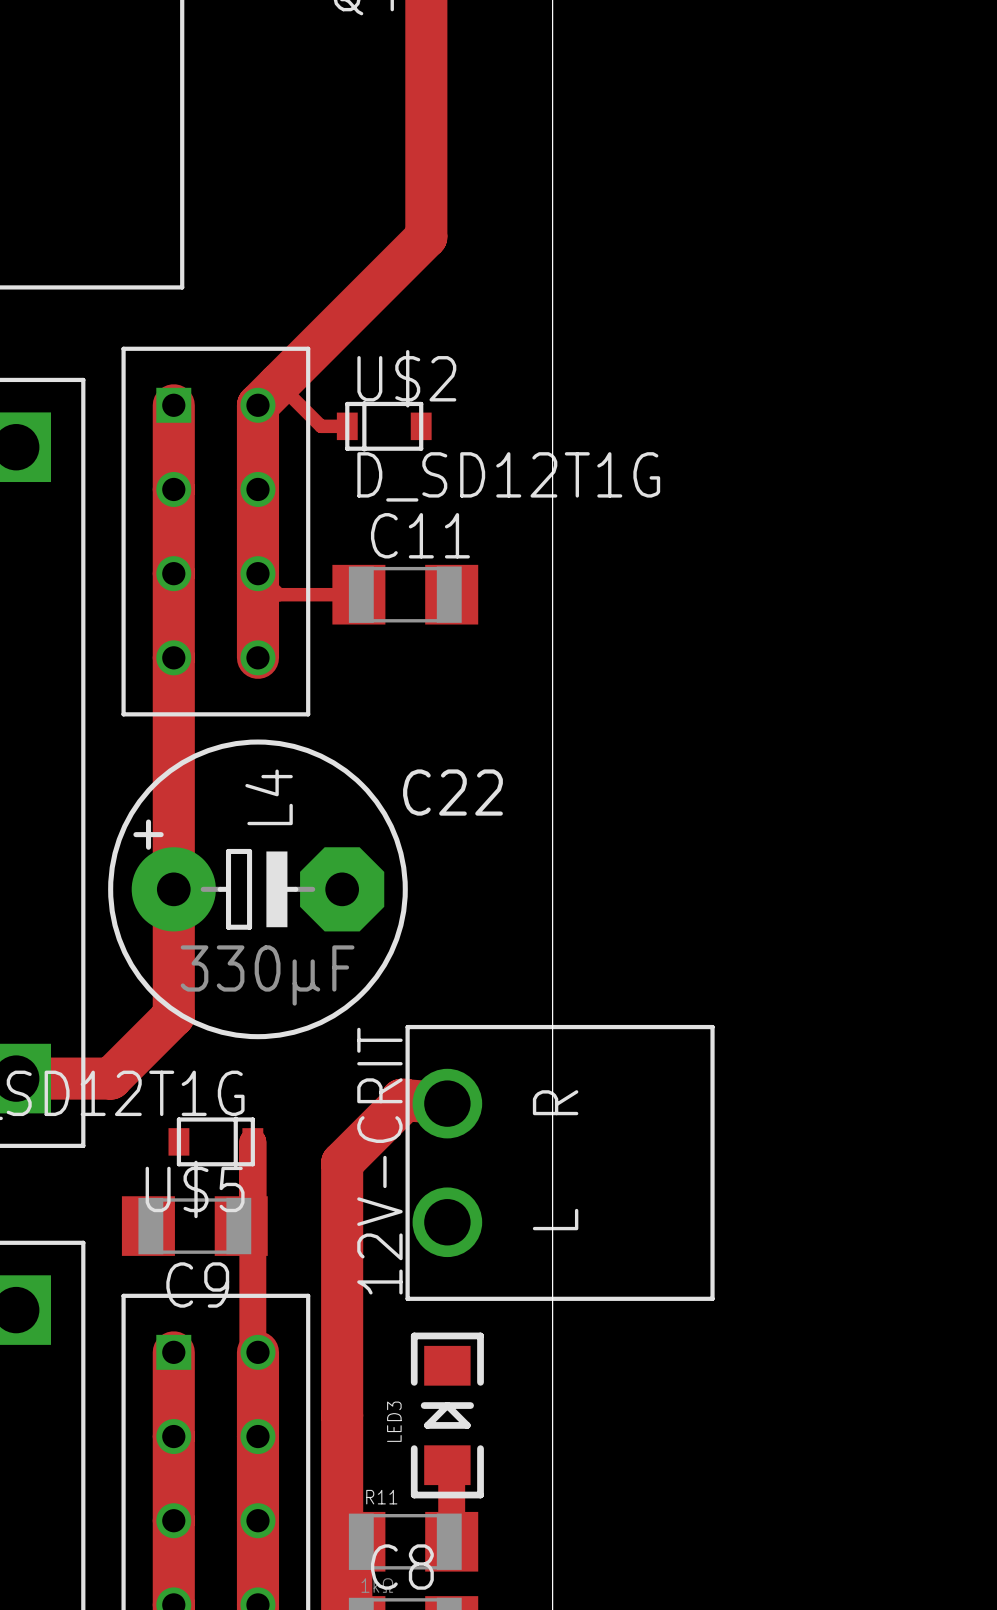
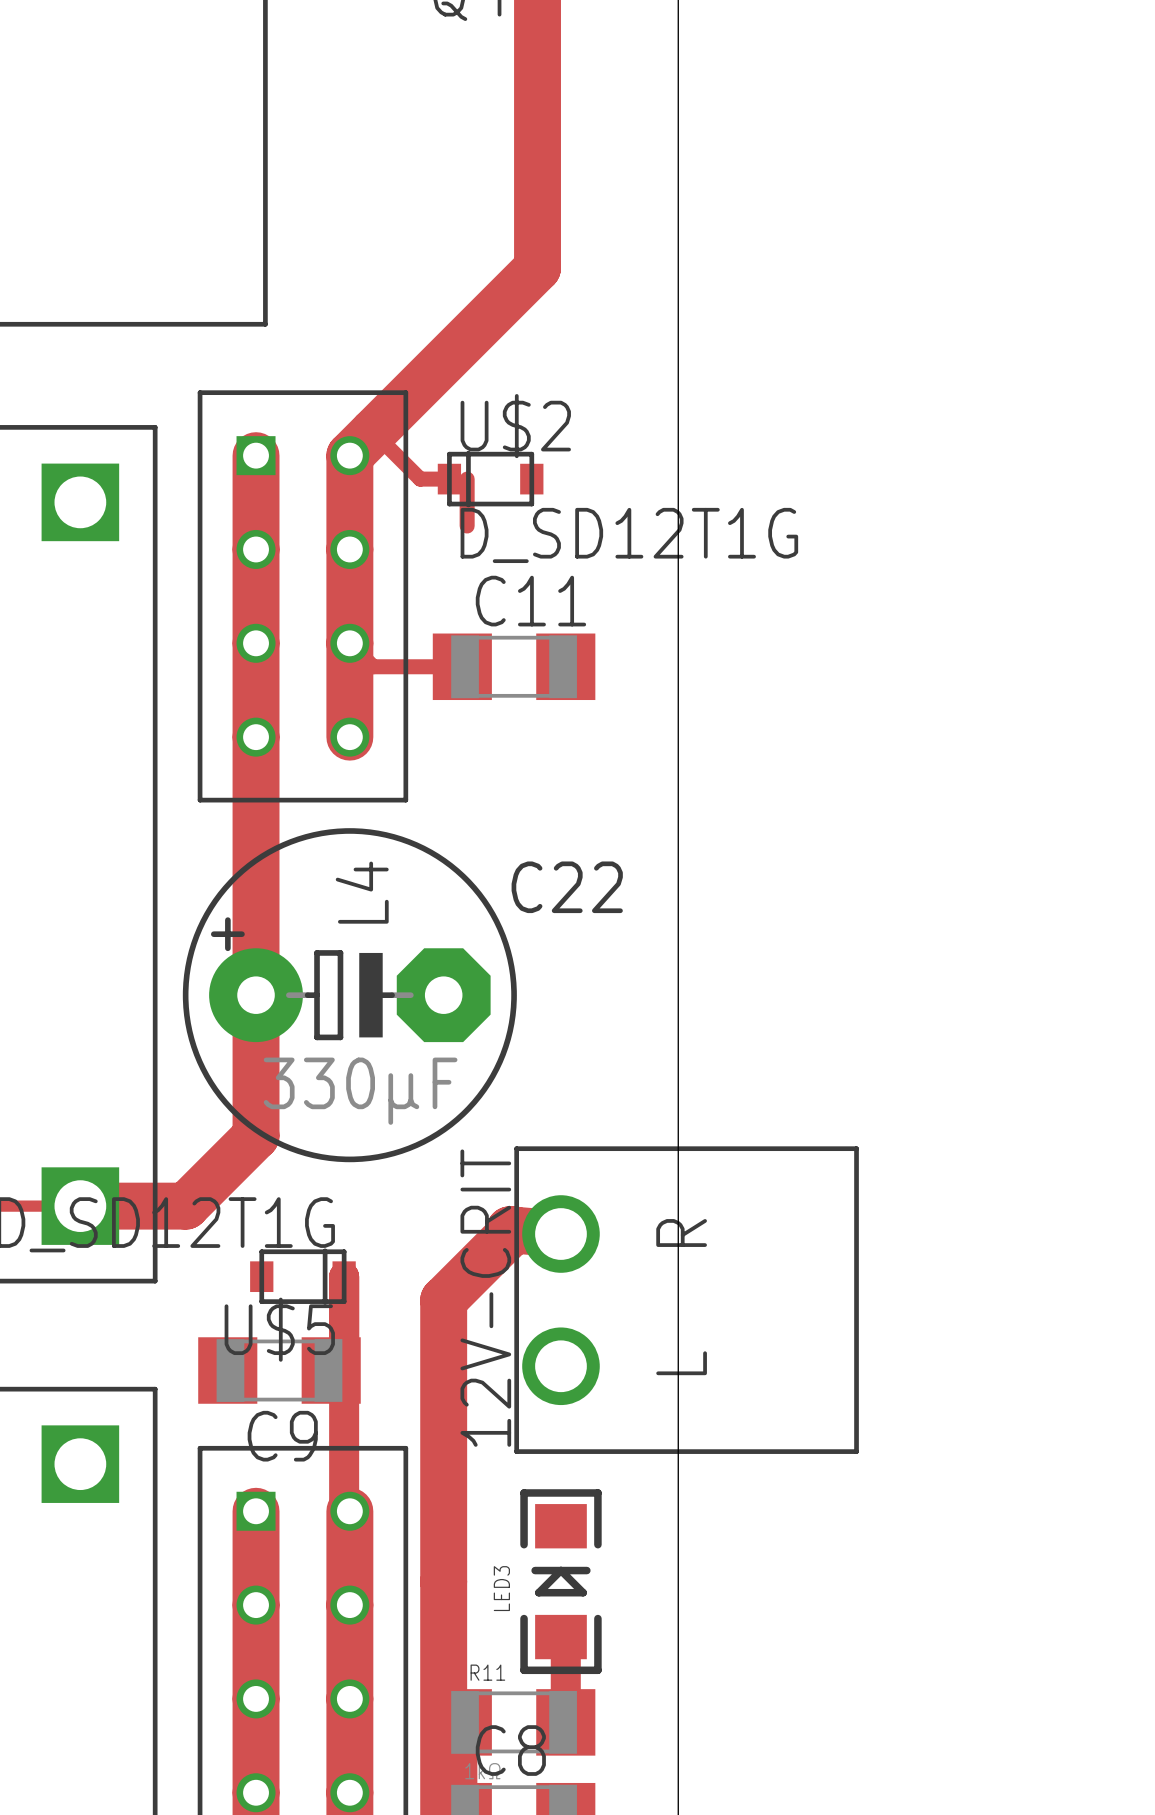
track: none -> (467, 479) (467, 526)

